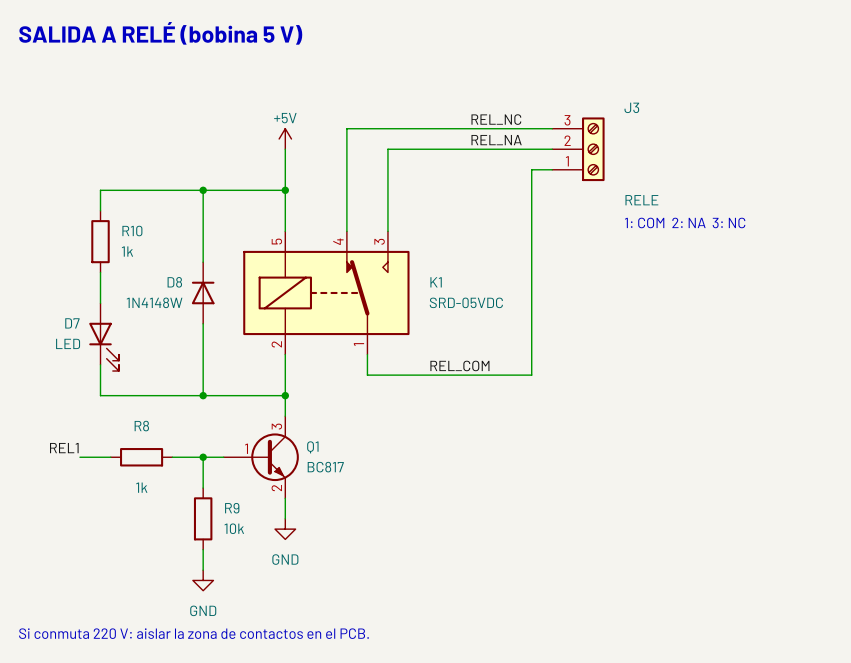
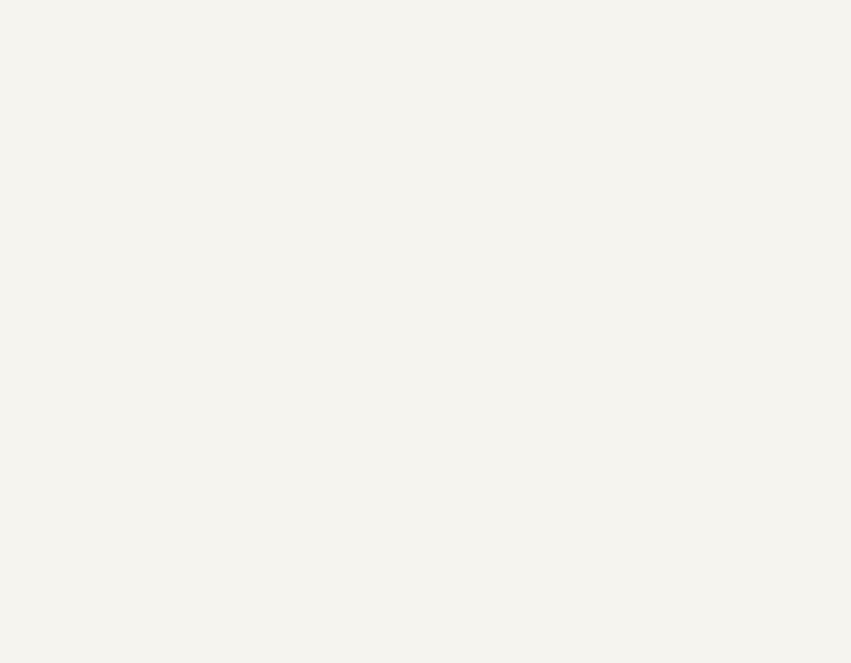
text: SALIDA A RELÉ (bobina 5 V) (160, 33) -> none
label: REL_NC (496, 119) -> none
wire: (552, 128) (346, 128) (346, 231) -> none
power symbol: +5V (285, 138) -> none
label: REL_NA (496, 140) -> none
wire: (285, 149) (285, 231) -> none
wire: (552, 149) (387, 149) (387, 231) -> none
J3: RELE (578, 149) -> none
wire: (552, 169) (531, 169) (531, 375) (367, 375) (367, 354) -> none
wire: (203, 190) (203, 262) -> none
junction: (203, 190) -> none
wire: (285, 190) (100, 190) (100, 210) -> none
junction: (285, 190) -> none
text: 1: COM 2: NA 3: NC (685, 222) -> none
R10: 1k (100, 241) -> none
wire: (100, 272) (100, 303) -> none
D8: 1N4148W (203, 292) -> none
K1: SRD-05VDC (326, 292) -> none
wire: (203, 323) (203, 395) -> none
D7: LED (104, 337) -> none
wire: (285, 354) (285, 416) -> none
wire: (100, 364) (100, 395) (285, 395) -> none
label: REL_COM (459, 365) -> none
junction: (203, 395) -> none
junction: (285, 395) -> none
label: REL1 (64, 448) -> none
wire: (79, 457) (110, 457) -> none
R8: 1k (141, 457) -> none
wire: (172, 457) (223, 457) -> none
wire: (203, 457) (203, 488) -> none
junction: (203, 457) -> none
Q1: BC817 (261, 457) -> none
wire: (285, 498) (285, 518) -> none
R9: 10k (203, 518) -> none
power symbol: GND (285, 529) -> none
wire: (203, 549) (203, 570) -> none
power symbol: GND (203, 580) -> none
text: Si conmuta 220 V: aislar la zona de contactos en el PCB. (194, 633) -> none

